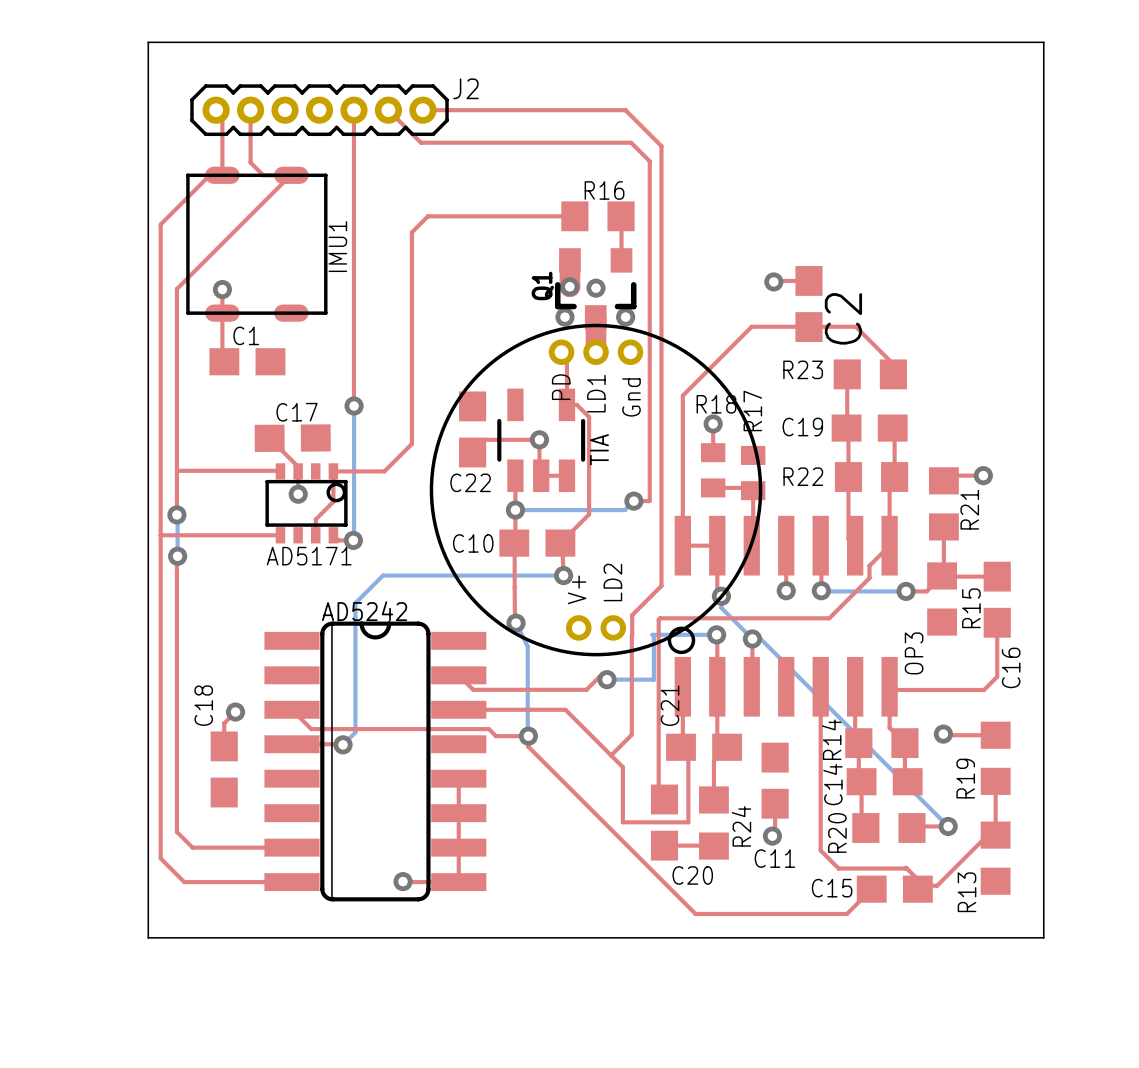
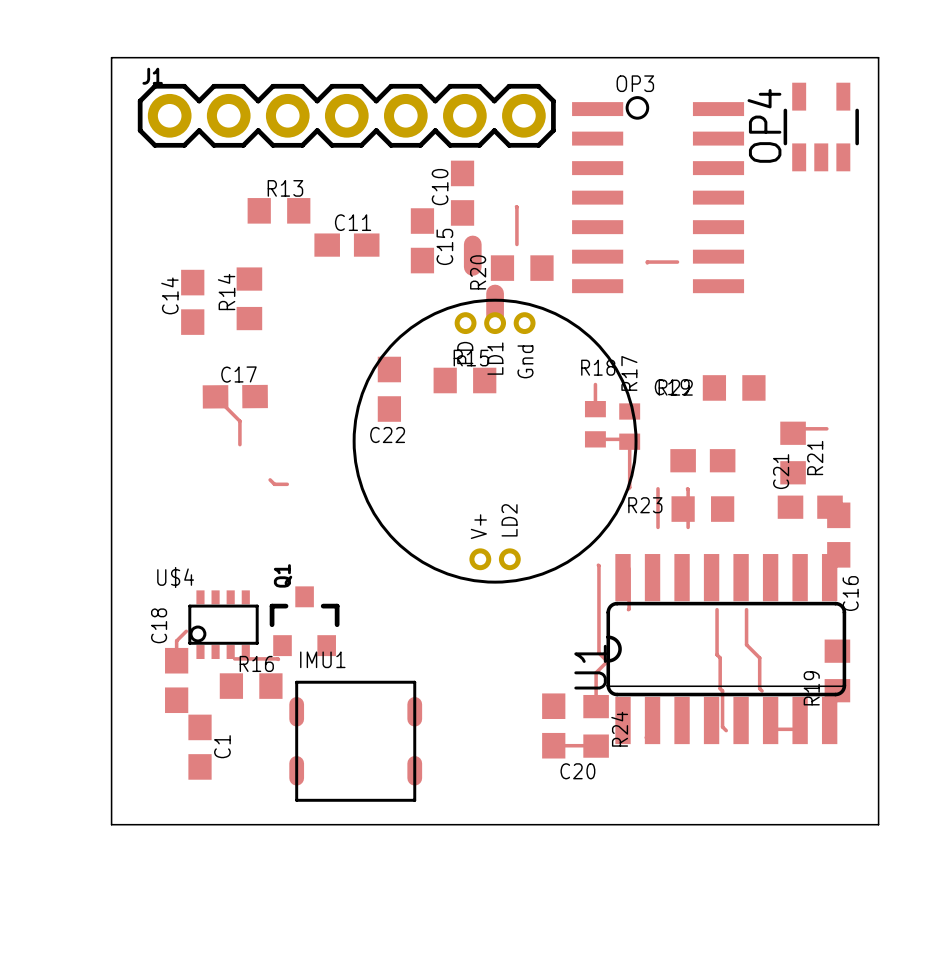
top track: (216, 110) (222, 116) (222, 175) (216, 169) (160, 224) (160, 858) (184, 882) (291, 882) -> none
top track: (250, 110) (250, 162) (263, 175) (291, 175) -> none
J2: (319, 110) -> none
top track: (353, 110) (353, 405) -> none
top track: (388, 110) (420, 142) (631, 142) (649, 161) (649, 500) (633, 501) -> none
top track: (422, 110) (625, 110) (661, 146) (661, 585) (632, 615) (632, 635) -> none
J1: none -> (346, 115)
OP4: none -> (821, 127)
top track: (290, 175) (176, 288) (176, 514) -> none
top track: (574, 216) (427, 216) (411, 232) (411, 443) (384, 471) (333, 471) (333, 501) (315, 519) (315, 535) -> none
R16 position: (597, 216) -> (251, 686)
IMU1 rotation: 0° (256, 244) -> 90° clockwise (355, 741)
IMU1 position: (256, 244) -> (355, 741)
IMU1 name position: IMU1 (337, 246) -> IMU1 (322, 659)
via: (773, 281) -> none
Q1 name position: Q1 (542, 285) -> Q1 (283, 575)
via: (569, 286) -> none
Q1 rotation: 0° (595, 288) -> 180° (304, 621)
Q1 position: (595, 288) -> (304, 621)
via: (595, 288) -> none
top track: (222, 289) (222, 359) (224, 361) -> none
via: (222, 289) -> none
C2: (808, 304) -> none
via: (564, 317) -> none
via: (625, 317) -> none
top track: (561, 352) (566, 357) (566, 404) (576, 404) (589, 417) (589, 514) (560, 543) (562, 544) (563, 575) -> none
C1 rotation: 0° (247, 361) -> 90° clockwise (200, 747)
C1 position: (247, 361) -> (200, 747)
top track: (847, 374) (848, 539) (855, 545) -> none
R23 position: (870, 374) -> (702, 509)
top track: (893, 374) (893, 364) (855, 326) (751, 326) (682, 395) (682, 545) (717, 545) (717, 592) (721, 596) -> none
bottom track: (354, 406) (353, 540) -> none
via: (354, 406) -> none
via: (713, 423) -> none
C19 position: (869, 428) -> (702, 460)
top track: (892, 428) (894, 429) (894, 477) (889, 482) (889, 545) (869, 565) (869, 578) (829, 618) (658, 619) (658, 796) (664, 799) -> none
via: (539, 439) -> none
TIA: (541, 440) -> none
top track: (472, 452) (485, 439) (539, 439) (539, 474) (541, 475) (566, 475) -> none
top track: (280, 471) (176, 471) -> none
top track: (515, 475) (516, 623) -> none
via: (983, 475) -> none
R22 position: (871, 477) -> (734, 387)
via: (298, 494) -> none
bottom track: (633, 501) (624, 510) (515, 510) -> none
via: (633, 501) -> none
AD5171: (306, 503) -> none
via: (515, 510) -> none
bottom track: (176, 514) (177, 556) -> none
via: (176, 514) -> none
top track: (943, 526) (943, 574) (926, 591) (906, 591) -> none
top track: (161, 535) (280, 535) -> none
via: (353, 540) -> none
C10 rotation: 0° (537, 543) -> 90° clockwise (462, 193)
C10 position: (537, 543) -> (462, 193)
top track: (177, 556) (176, 831) (192, 847) (291, 847) -> none
via: (177, 556) -> none
bottom track: (563, 575) (383, 575) (355, 603) (355, 732) (343, 744) -> none
via: (563, 575) -> none
top track: (942, 575) (997, 576) -> none
via: (786, 590) -> none
bottom track: (821, 590) (906, 591) -> none
via: (821, 590) -> none
via: (906, 591) -> none
bottom track: (721, 596) (721, 607) (752, 638) (760, 638) (948, 826) -> none
via: (721, 596) -> none
R15 rotation: 0° (942, 599) -> 90° clockwise (464, 380)
R15 position: (942, 599) -> (464, 380)
OP3 rotation: 0° (782, 616) -> 90° clockwise (658, 194)
OP3 position: (782, 616) -> (658, 194)
top track: (997, 622) (997, 676) (984, 689) (889, 689) -> none
bottom track: (516, 623) (527, 646) (528, 736) -> none
via: (516, 623) -> none
bottom track: (716, 634) (652, 634) (653, 679) (607, 679) -> none
via: (716, 634) -> none
top track: (631, 636) (631, 734) (611, 755) -> none
via: (752, 638) -> none
OP3 name position: OP3 (914, 653) -> OP3 (635, 83)
top track: (458, 675) (473, 689) (586, 689) (599, 676) (604, 676) (607, 679) -> none
via: (607, 679) -> none
top track: (682, 686) (682, 745) (680, 747) (688, 754) (688, 822) (622, 822) (622, 767) (565, 709) (458, 709) -> none
top track: (820, 686) (820, 850) (838, 868) (906, 867) (917, 879) (917, 889) (921, 885) (937, 885) (989, 833) (995, 833) -> none
U$4: none -> (223, 624)
top track: (291, 709) (311, 729) (488, 729) (496, 736) (528, 736) (528, 746) (695, 913) (846, 913) (871, 889) -> none
via: (235, 712) -> none
U1: none -> (726, 649)
top track: (943, 734) (995, 735) -> none
via: (943, 734) -> none
via: (528, 736) -> none
R14 rotation: 0° (881, 743) -> 90° clockwise (249, 298)
R14 position: (881, 743) -> (249, 298)
via: (343, 744) -> none
C21 position: (704, 747) -> (810, 507)
AD5242: (375, 761) -> none
top track: (458, 778) (458, 882) (403, 881) -> none
C11 rotation: 0° (775, 780) -> 90° clockwise (346, 245)
C11 position: (775, 780) -> (346, 245)
C14 rotation: 0° (884, 781) -> 90° clockwise (192, 302)
C14 position: (884, 781) -> (192, 302)
top track: (995, 781) (995, 835) -> none
via: (948, 826) -> none
R20 position: (888, 827) -> (522, 268)
via: (772, 836) -> none
C11 name position: C11 (774, 858) -> C11 (353, 222)
R13 rotation: 0° (995, 858) -> 90° clockwise (278, 210)
R13 position: (995, 858) -> (278, 210)
via: (403, 881) -> none
C15 name position: C15 (832, 888) -> C15 (444, 246)
C15 rotation: 0° (894, 889) -> 90° clockwise (422, 240)
C15 position: (894, 889) -> (422, 240)

